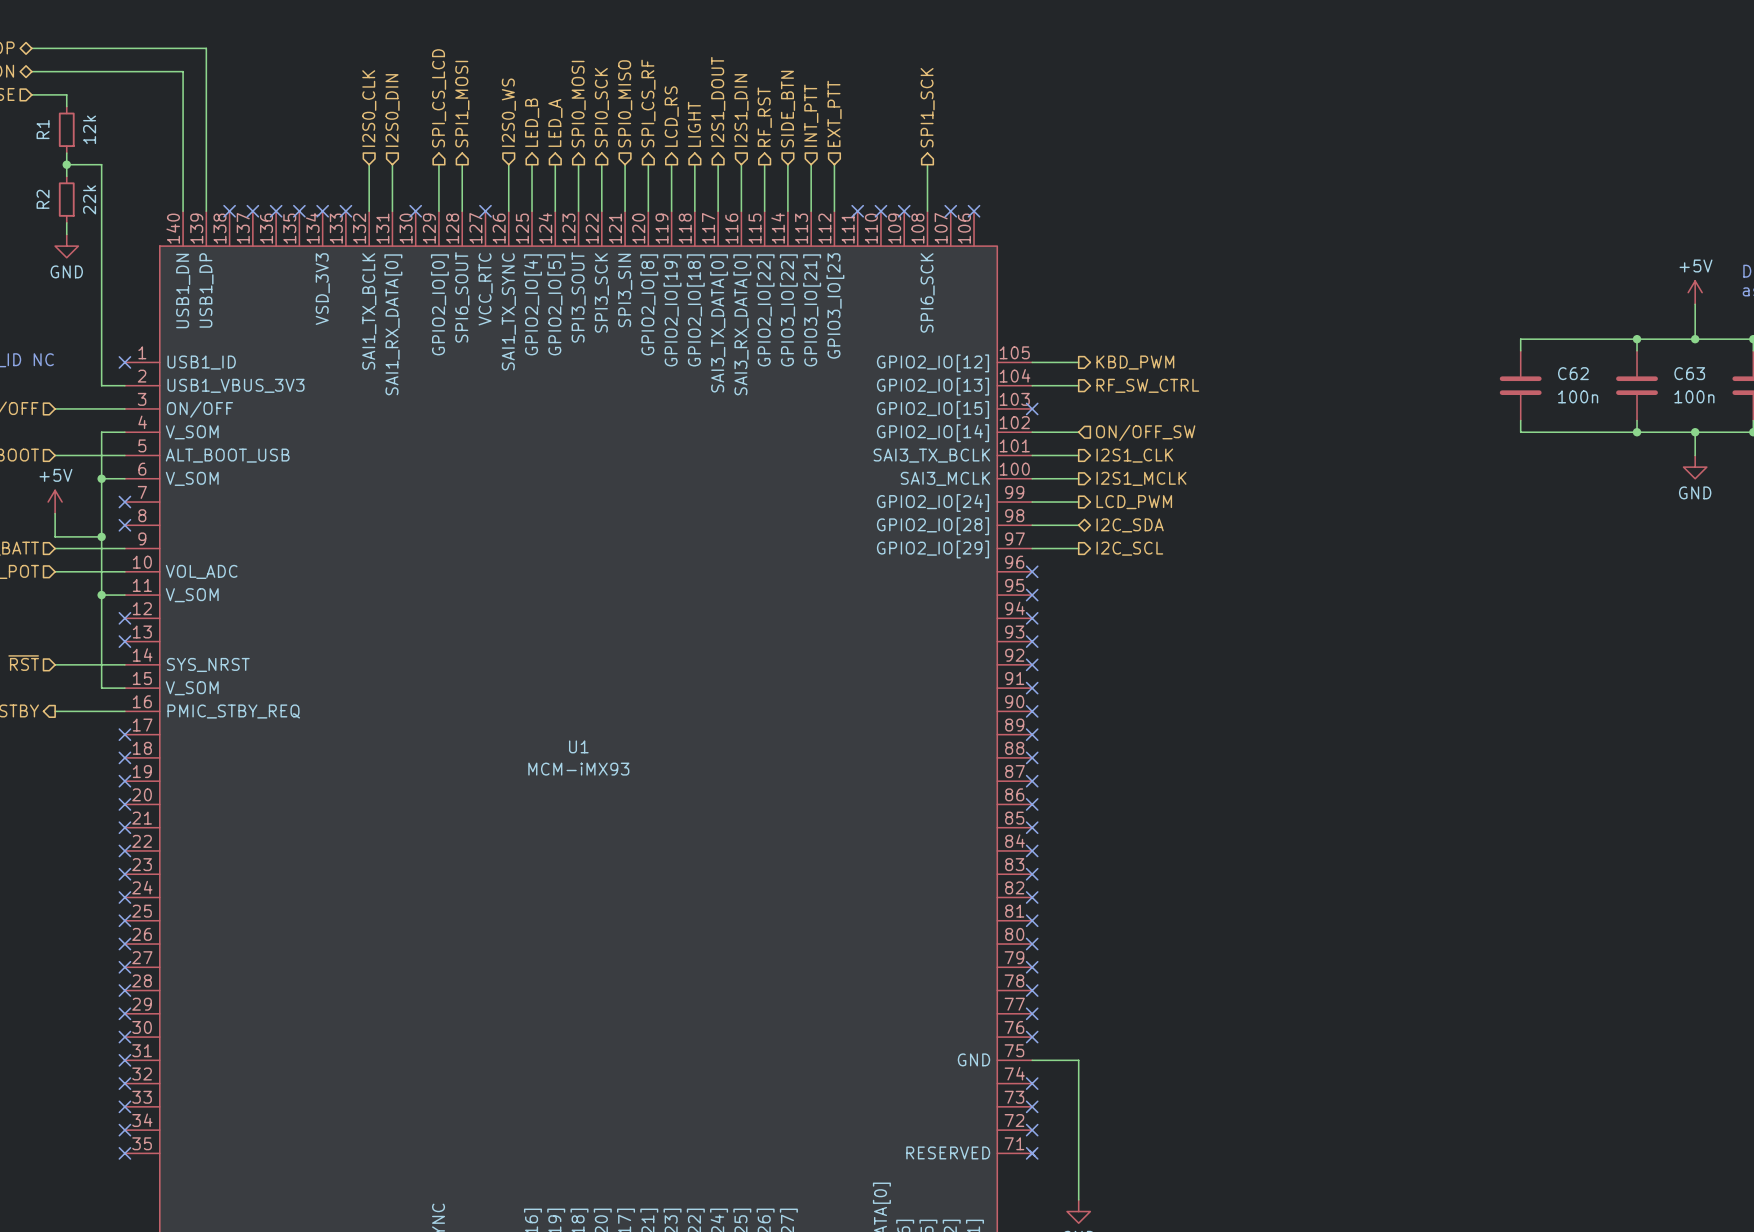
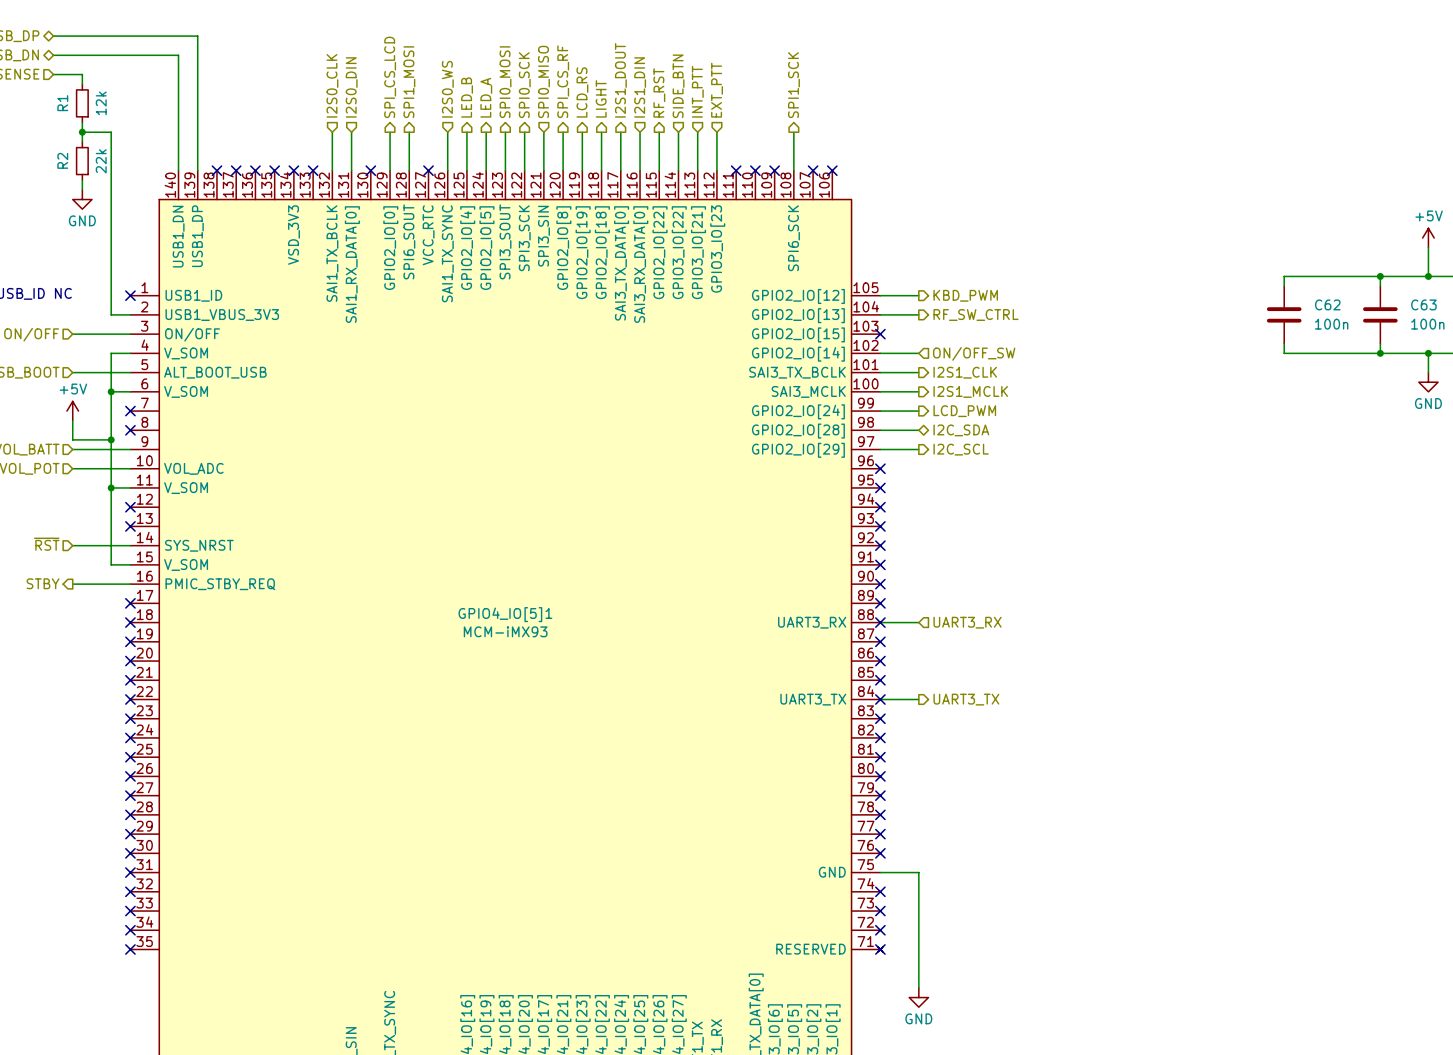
U1 name: U1 (578, 746) -> GPIO4_IO[5]1 (505, 614)
wire: none -> (880, 622) (918, 622)
U1 pin name: none -> UART3_RX (812, 622)
hierarchical label: none -> UART3_RX (967, 622)
wire: none -> (880, 699) (918, 699)
U1 pin name: none -> UART3_TX (813, 699)
hierarchical label: none -> UART3_TX (966, 699)

